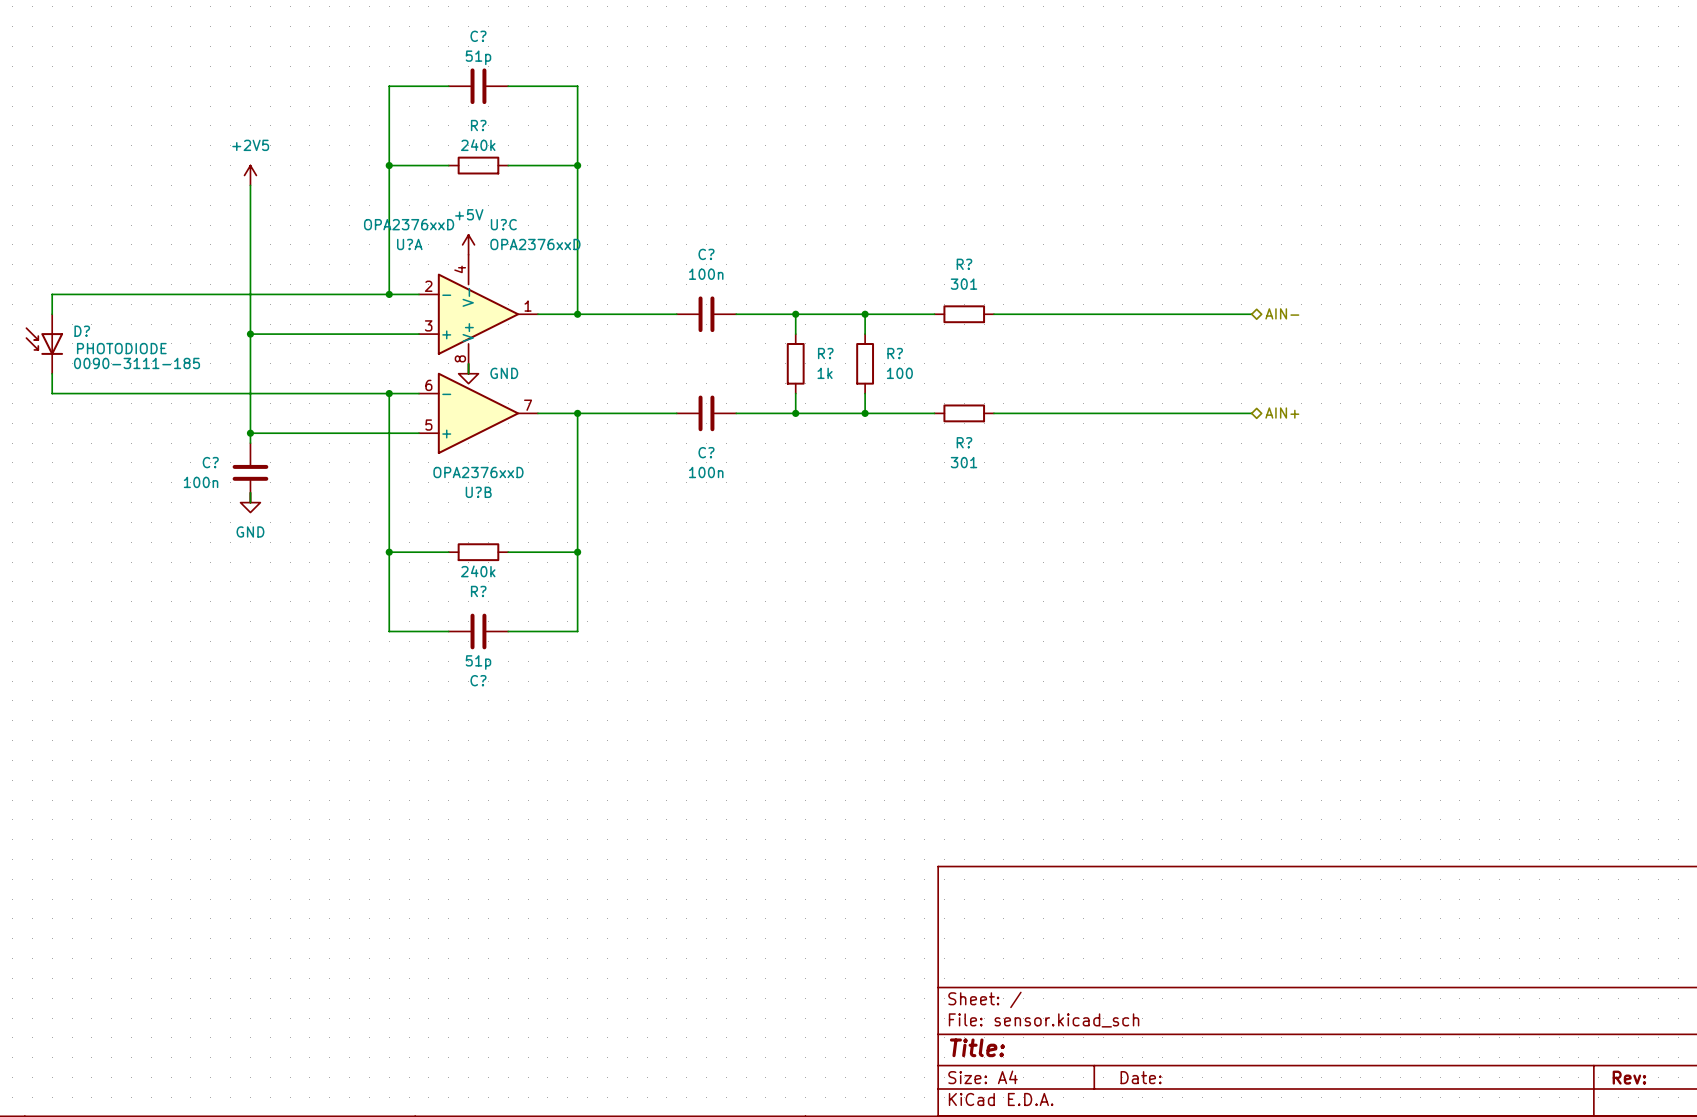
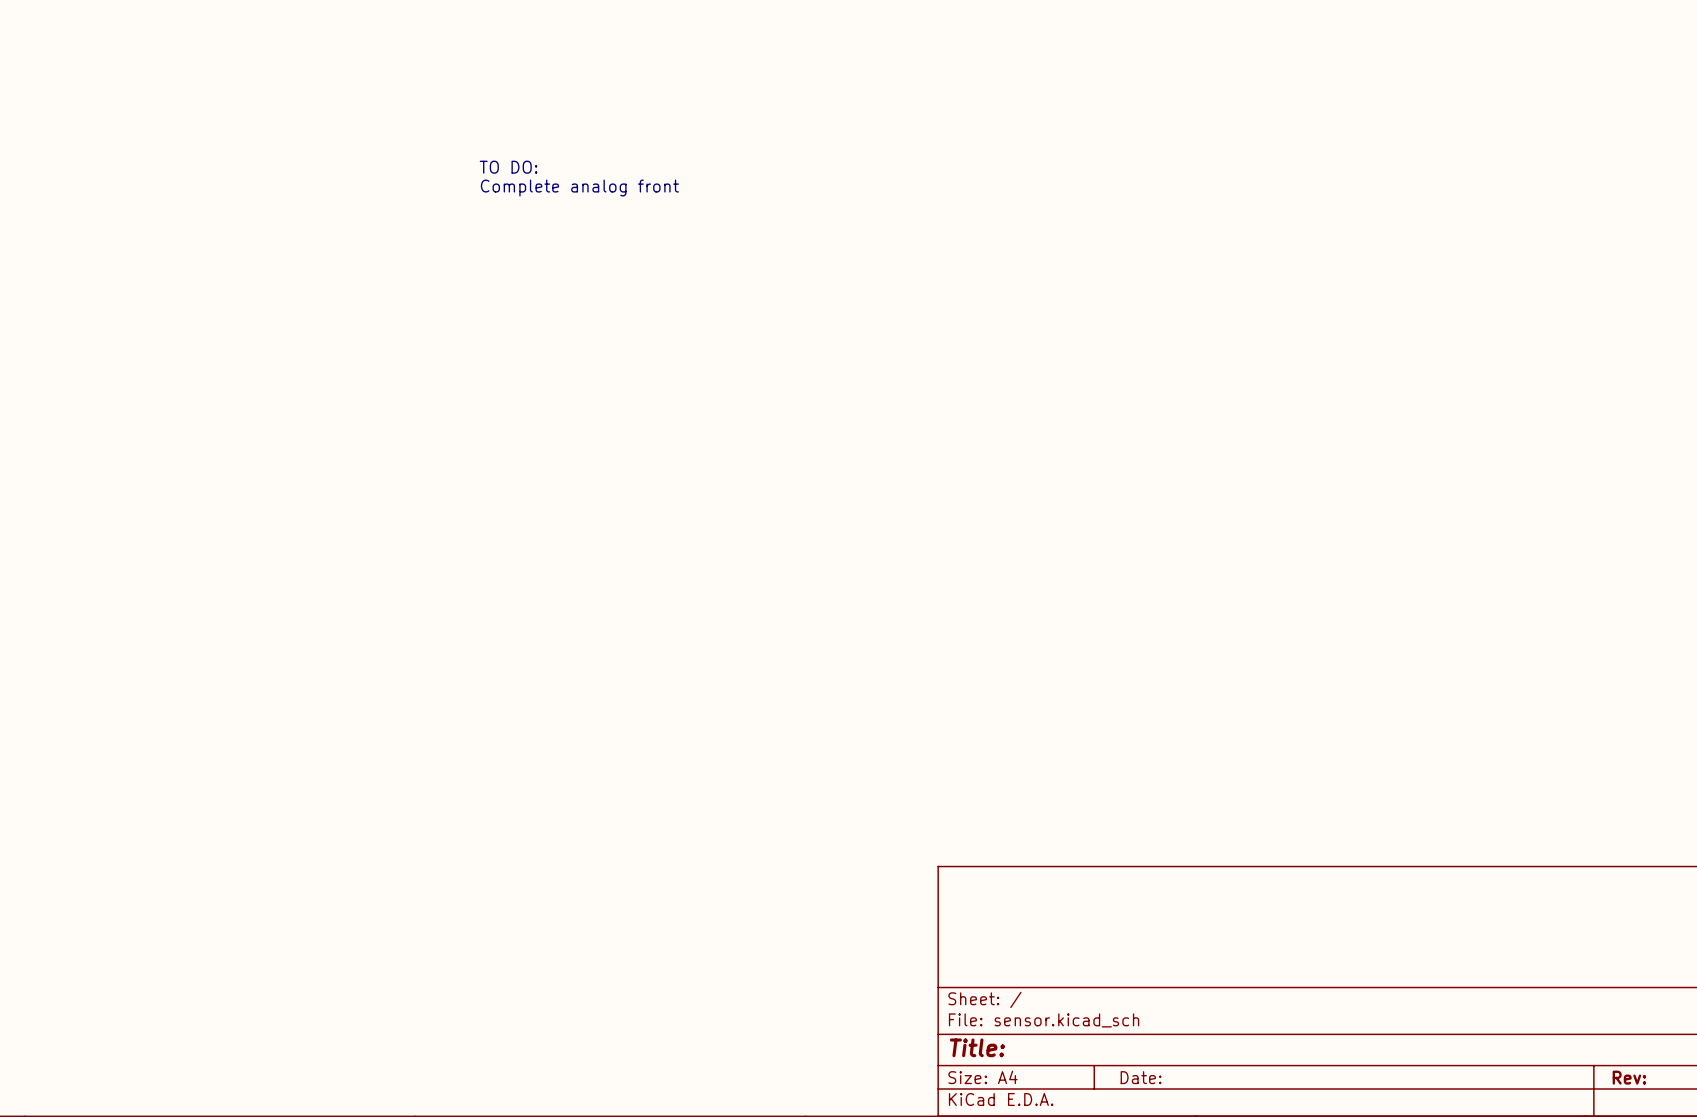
wire: (448, 86) (389, 86) (389, 294) -> none
C?: 51p (478, 86) -> none
wire: (508, 86) (577, 86) (577, 314) -> none
wire: (389, 165) (448, 165) -> none
junction: (389, 165) -> none
R?: 240k (478, 165) -> none
wire: (508, 165) (577, 165) -> none
junction: (577, 165) -> none
text: none -> TO DO: (508, 167)
power symbol: +2V5 (250, 175) -> none
wire: (250, 185) (250, 443) -> none
text: none -> Complete analog front (579, 188)
power symbol: +5V (468, 244) -> none
junction: (389, 294) -> none
wire: (418, 294) (52, 294) (52, 314) -> none
hierarchical label: AIN- (1282, 313) -> none
U?C: OPA2376xxD (468, 314) -> none
U?A: OPA2376xxD (478, 314) -> none
wire: (537, 314) (676, 314) -> none
junction: (577, 314) -> none
C?: 100n (706, 314) -> none
wire: (736, 314) (934, 314) -> none
wire: (795, 314) (795, 334) -> none
junction: (795, 314) -> none
wire: (865, 314) (865, 334) -> none
junction: (865, 314) -> none
R?: 301 (964, 314) -> none
wire: (993, 314) (1251, 314) -> none
wire: (250, 334) (418, 334) -> none
junction: (250, 334) -> none
D?: 0090-3111-185 (44, 343) -> none
wire: (468, 363) (468, 373) -> none
R?: 1k (795, 363) -> none
R?: 100 (865, 363) -> none
wire: (52, 373) (52, 393) (418, 393) -> none
power symbol: GND (468, 373) -> none
wire: (389, 393) (389, 631) (448, 631) -> none
junction: (389, 393) -> none
wire: (795, 393) (795, 413) -> none
wire: (865, 393) (865, 413) -> none
U?B: OPA2376xxD (478, 413) -> none
wire: (537, 413) (676, 413) -> none
wire: (577, 413) (577, 631) (508, 631) -> none
junction: (577, 413) -> none
C?: 100n (706, 413) -> none
wire: (736, 413) (934, 413) -> none
junction: (795, 413) -> none
junction: (865, 413) -> none
R?: 301 (964, 413) -> none
wire: (993, 413) (1251, 413) -> none
hierarchical label: AIN+ (1282, 413) -> none
wire: (250, 433) (418, 433) -> none
junction: (250, 433) -> none
C?: 100n (250, 472) -> none
wire: (250, 492) (250, 502) -> none
power symbol: GND (250, 502) -> none
wire: (389, 552) (448, 552) -> none
junction: (389, 552) -> none
R?: 240k (478, 552) -> none
wire: (508, 552) (577, 552) -> none
junction: (577, 552) -> none
C?: 51p (478, 631) -> none

